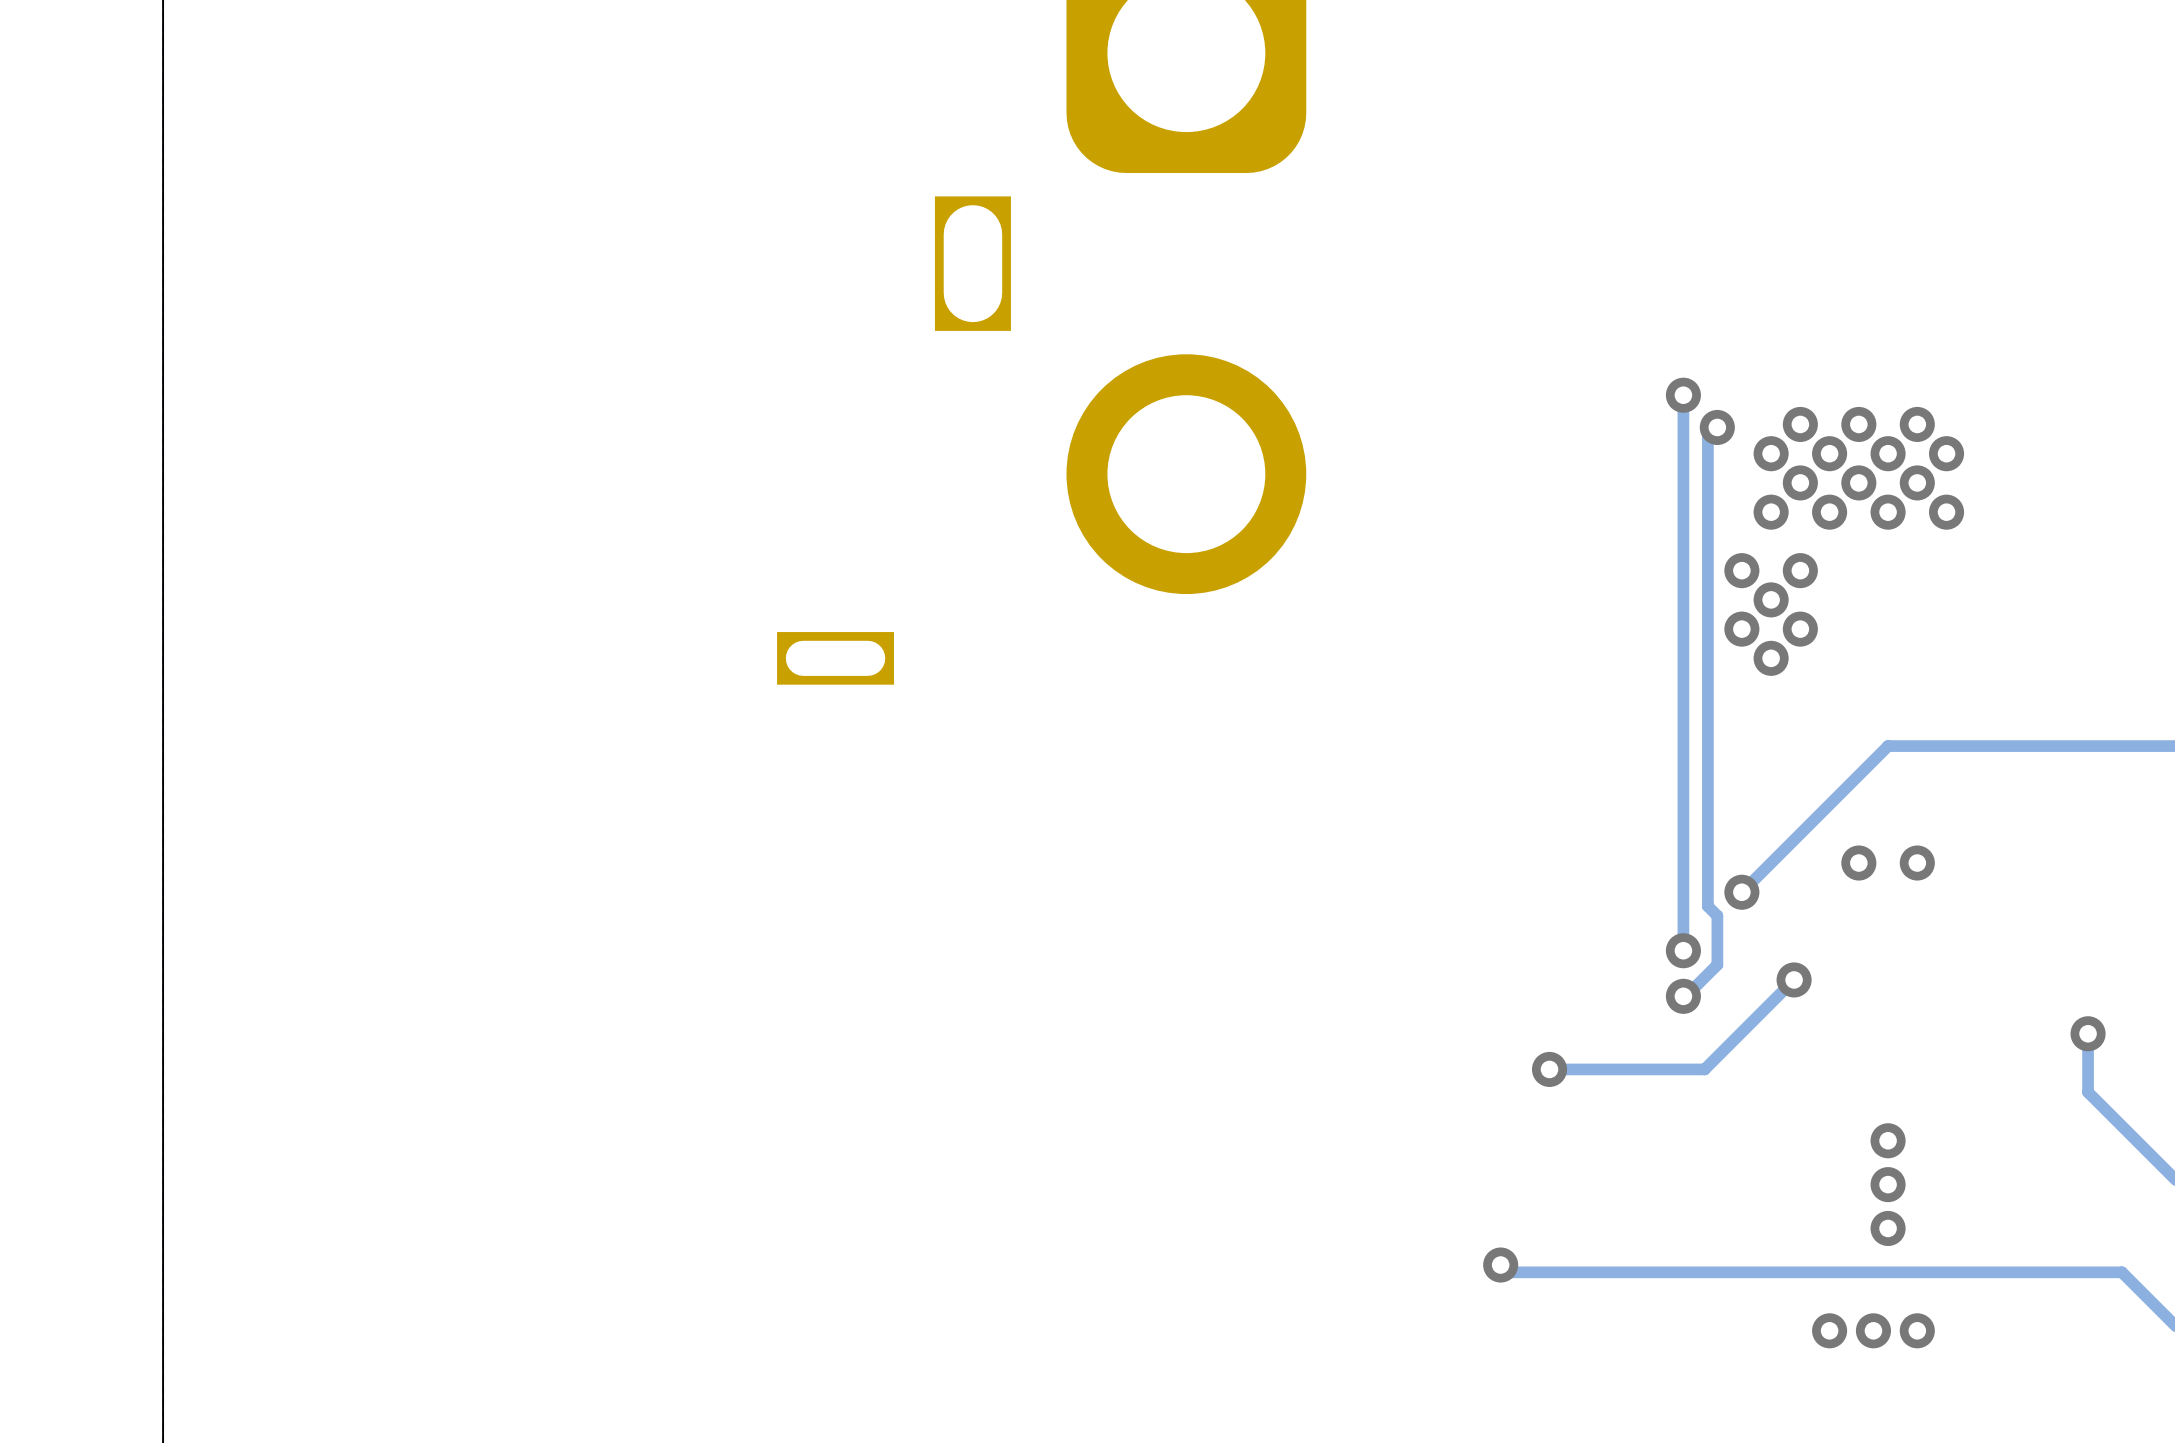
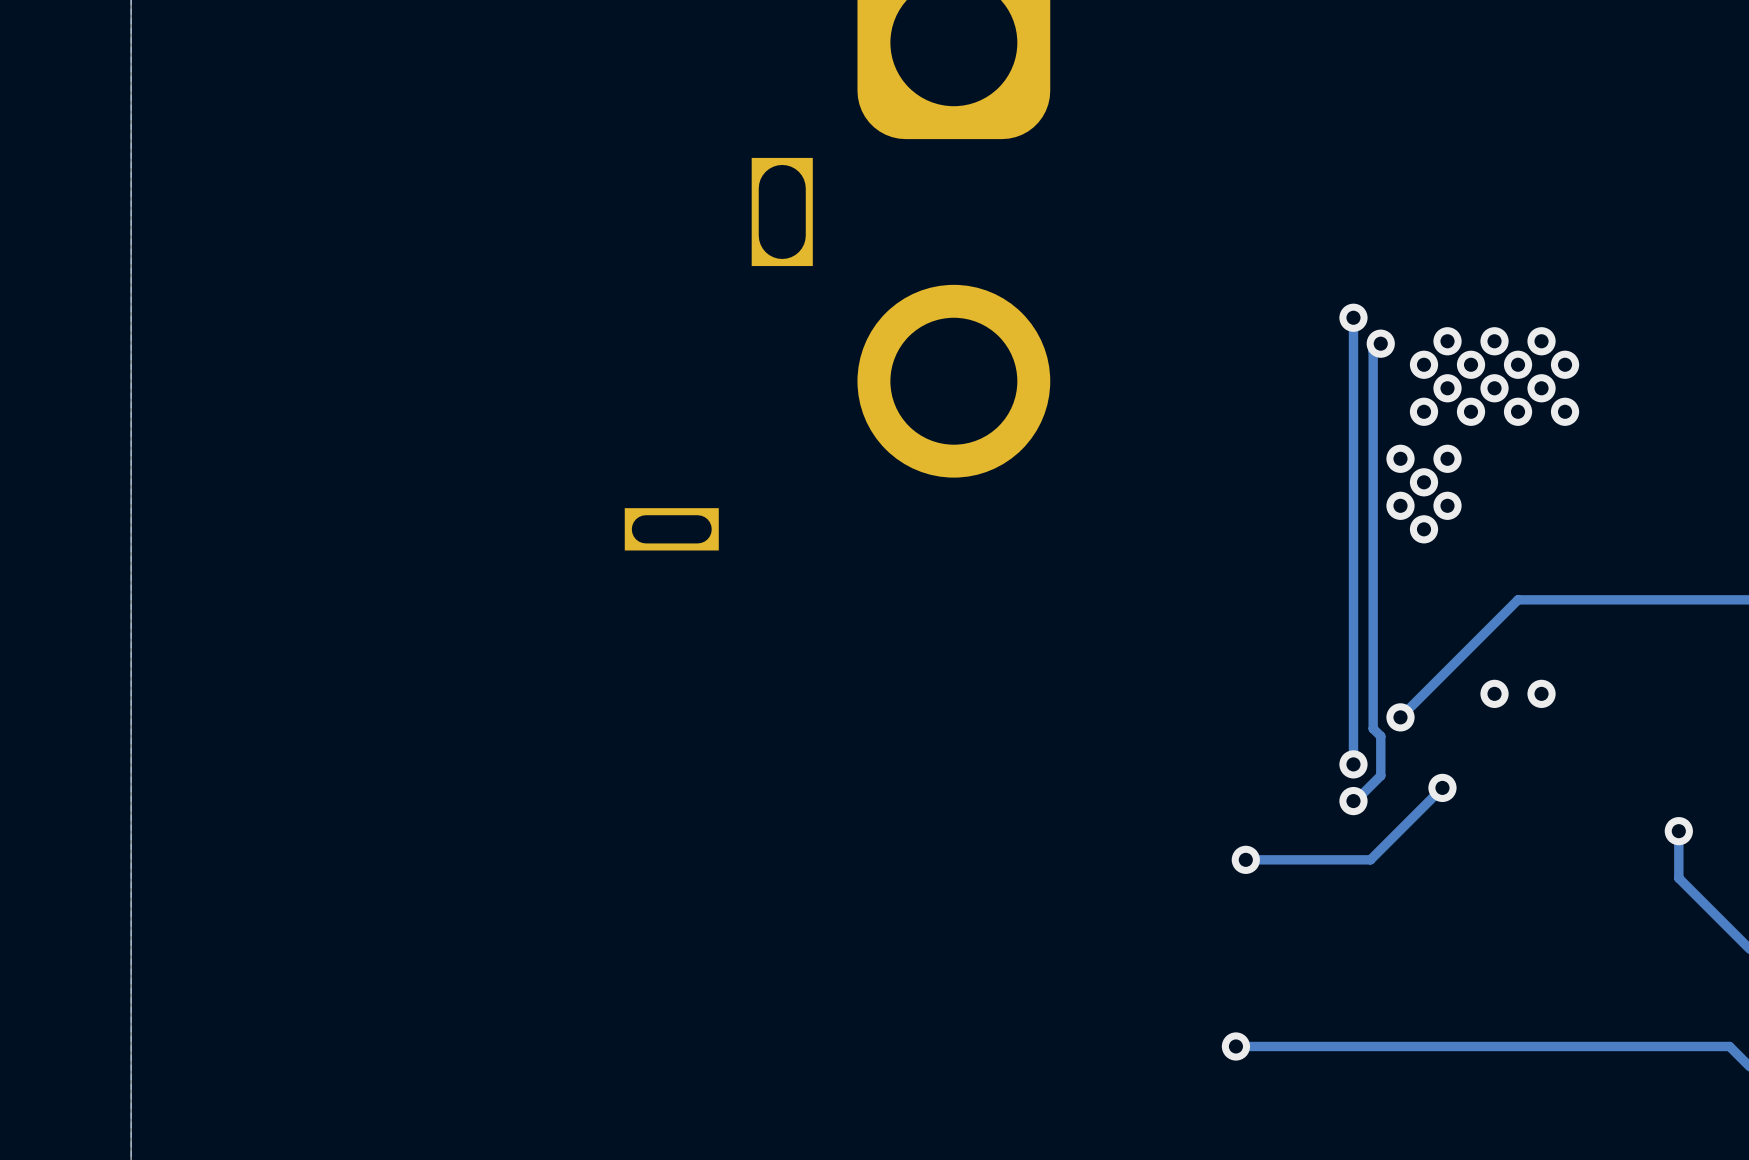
via: (1888, 1140) -> none
via: (1888, 1184) -> none
via: (1888, 1228) -> none
track: (1500, 1265) (1507, 1272) (2121, 1272) (2151, 1301) -> (1235, 1046) (1729, 1046)
via position: (1500, 1265) -> (1235, 1046)
via: (1829, 1330) -> none
via: (1873, 1330) -> none
via: (1917, 1330) -> none

